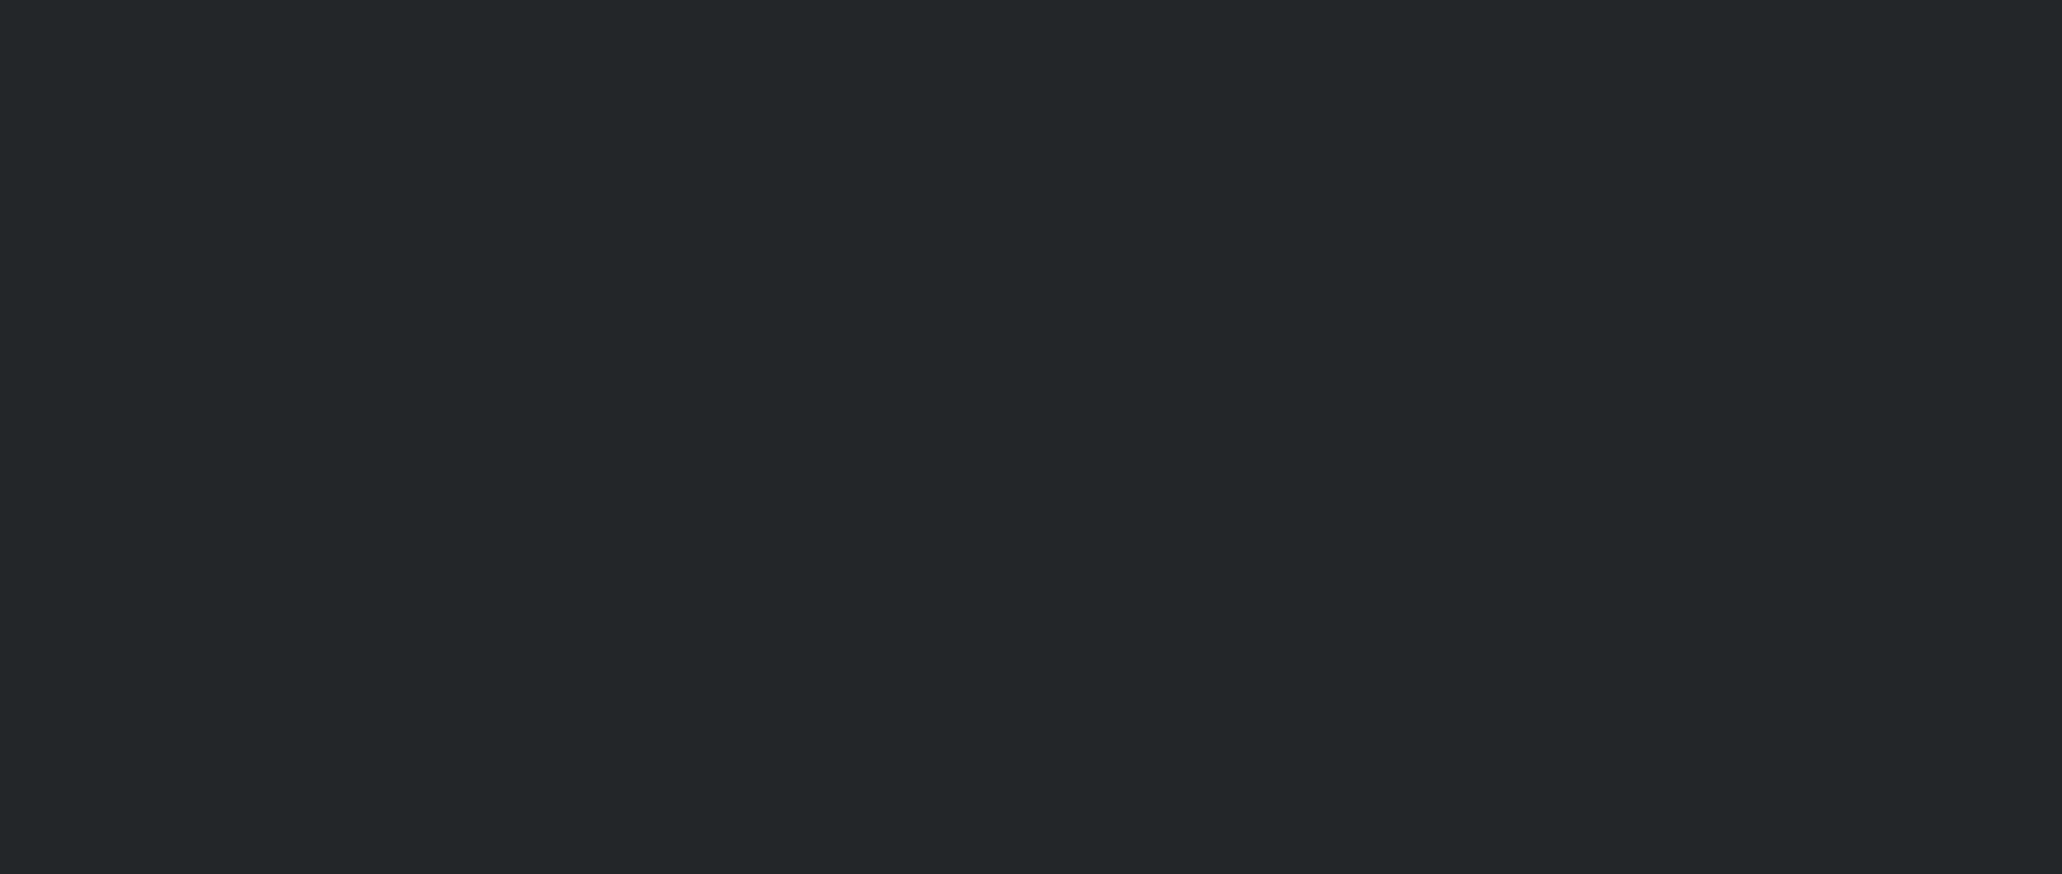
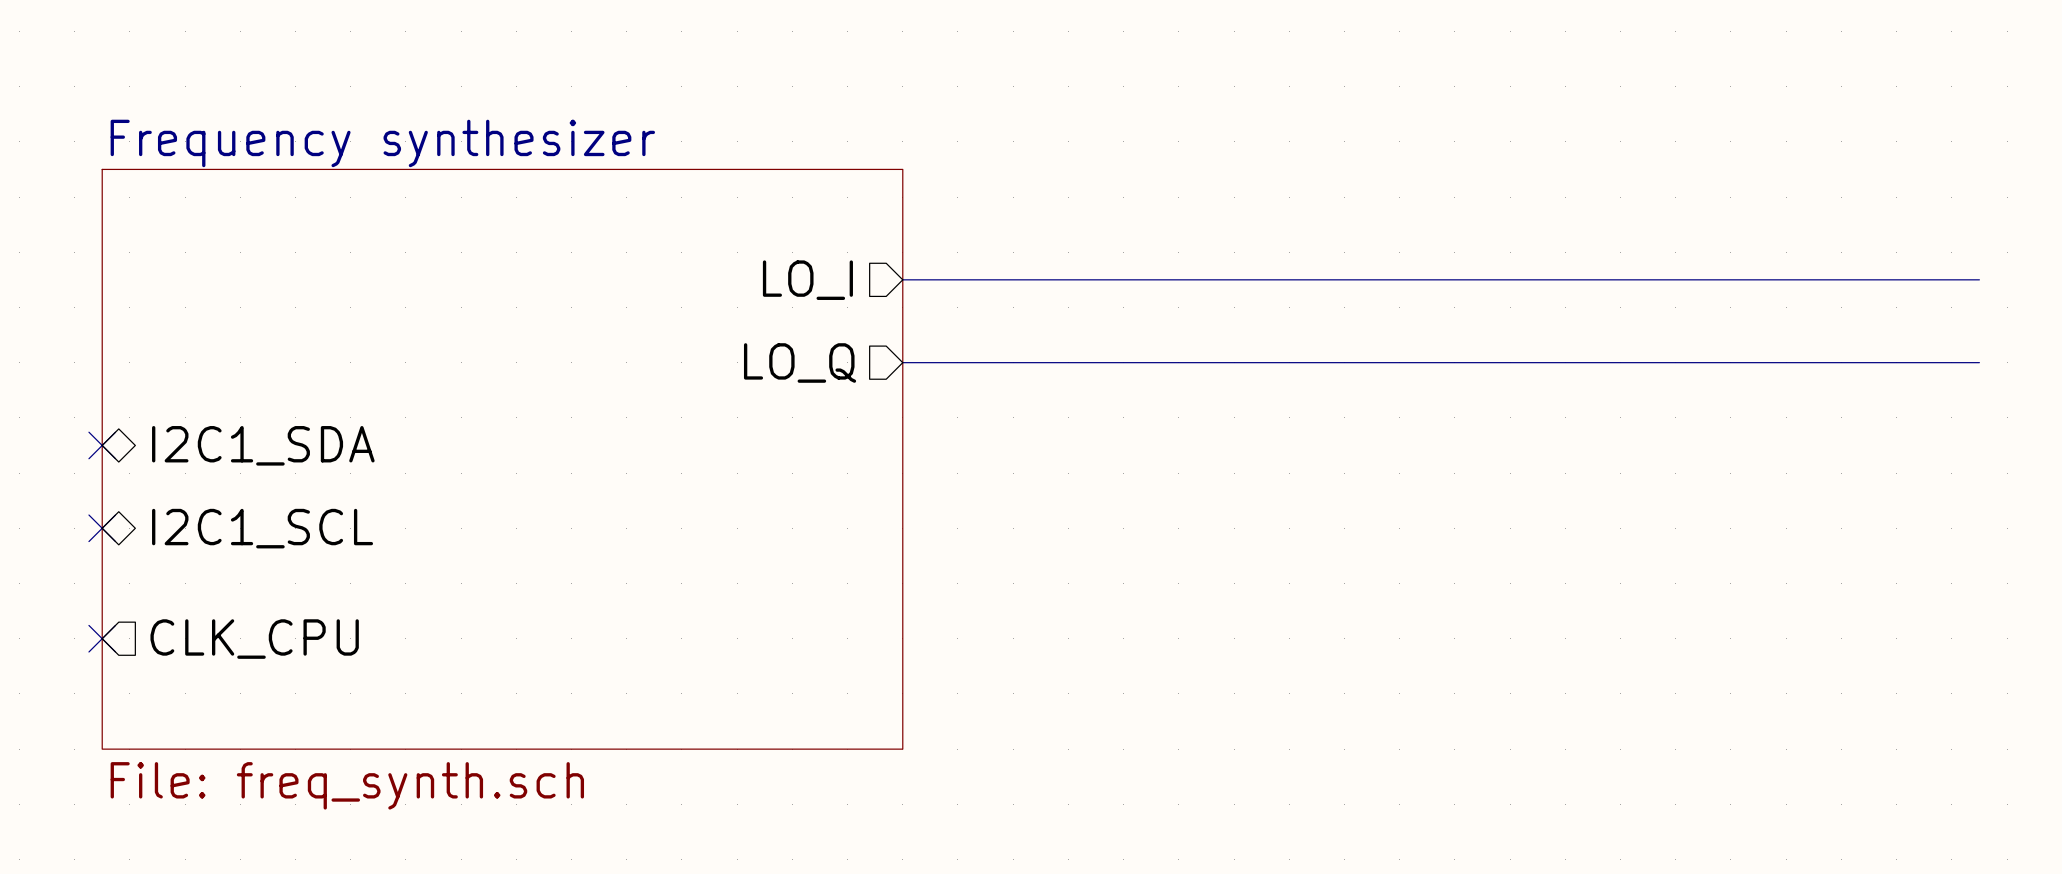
wire: none -> (902, 279) (1979, 279)
sheet pin: none -> LO_I (807, 280)
sheet pin: none -> LO_Q (800, 362)
wire: none -> (902, 362) (1979, 362)
no-connect mark: none -> (102, 445)
sheet pin: none -> I2C1_SDA (263, 445)
sheet Frequency synthesizer: none -> File: freq_synth.sch (502, 459)
no-connect mark: none -> (102, 528)
sheet pin: none -> I2C1_SCL (262, 528)
no-connect mark: none -> (102, 638)
sheet pin: none -> CLK_CPU (254, 639)

